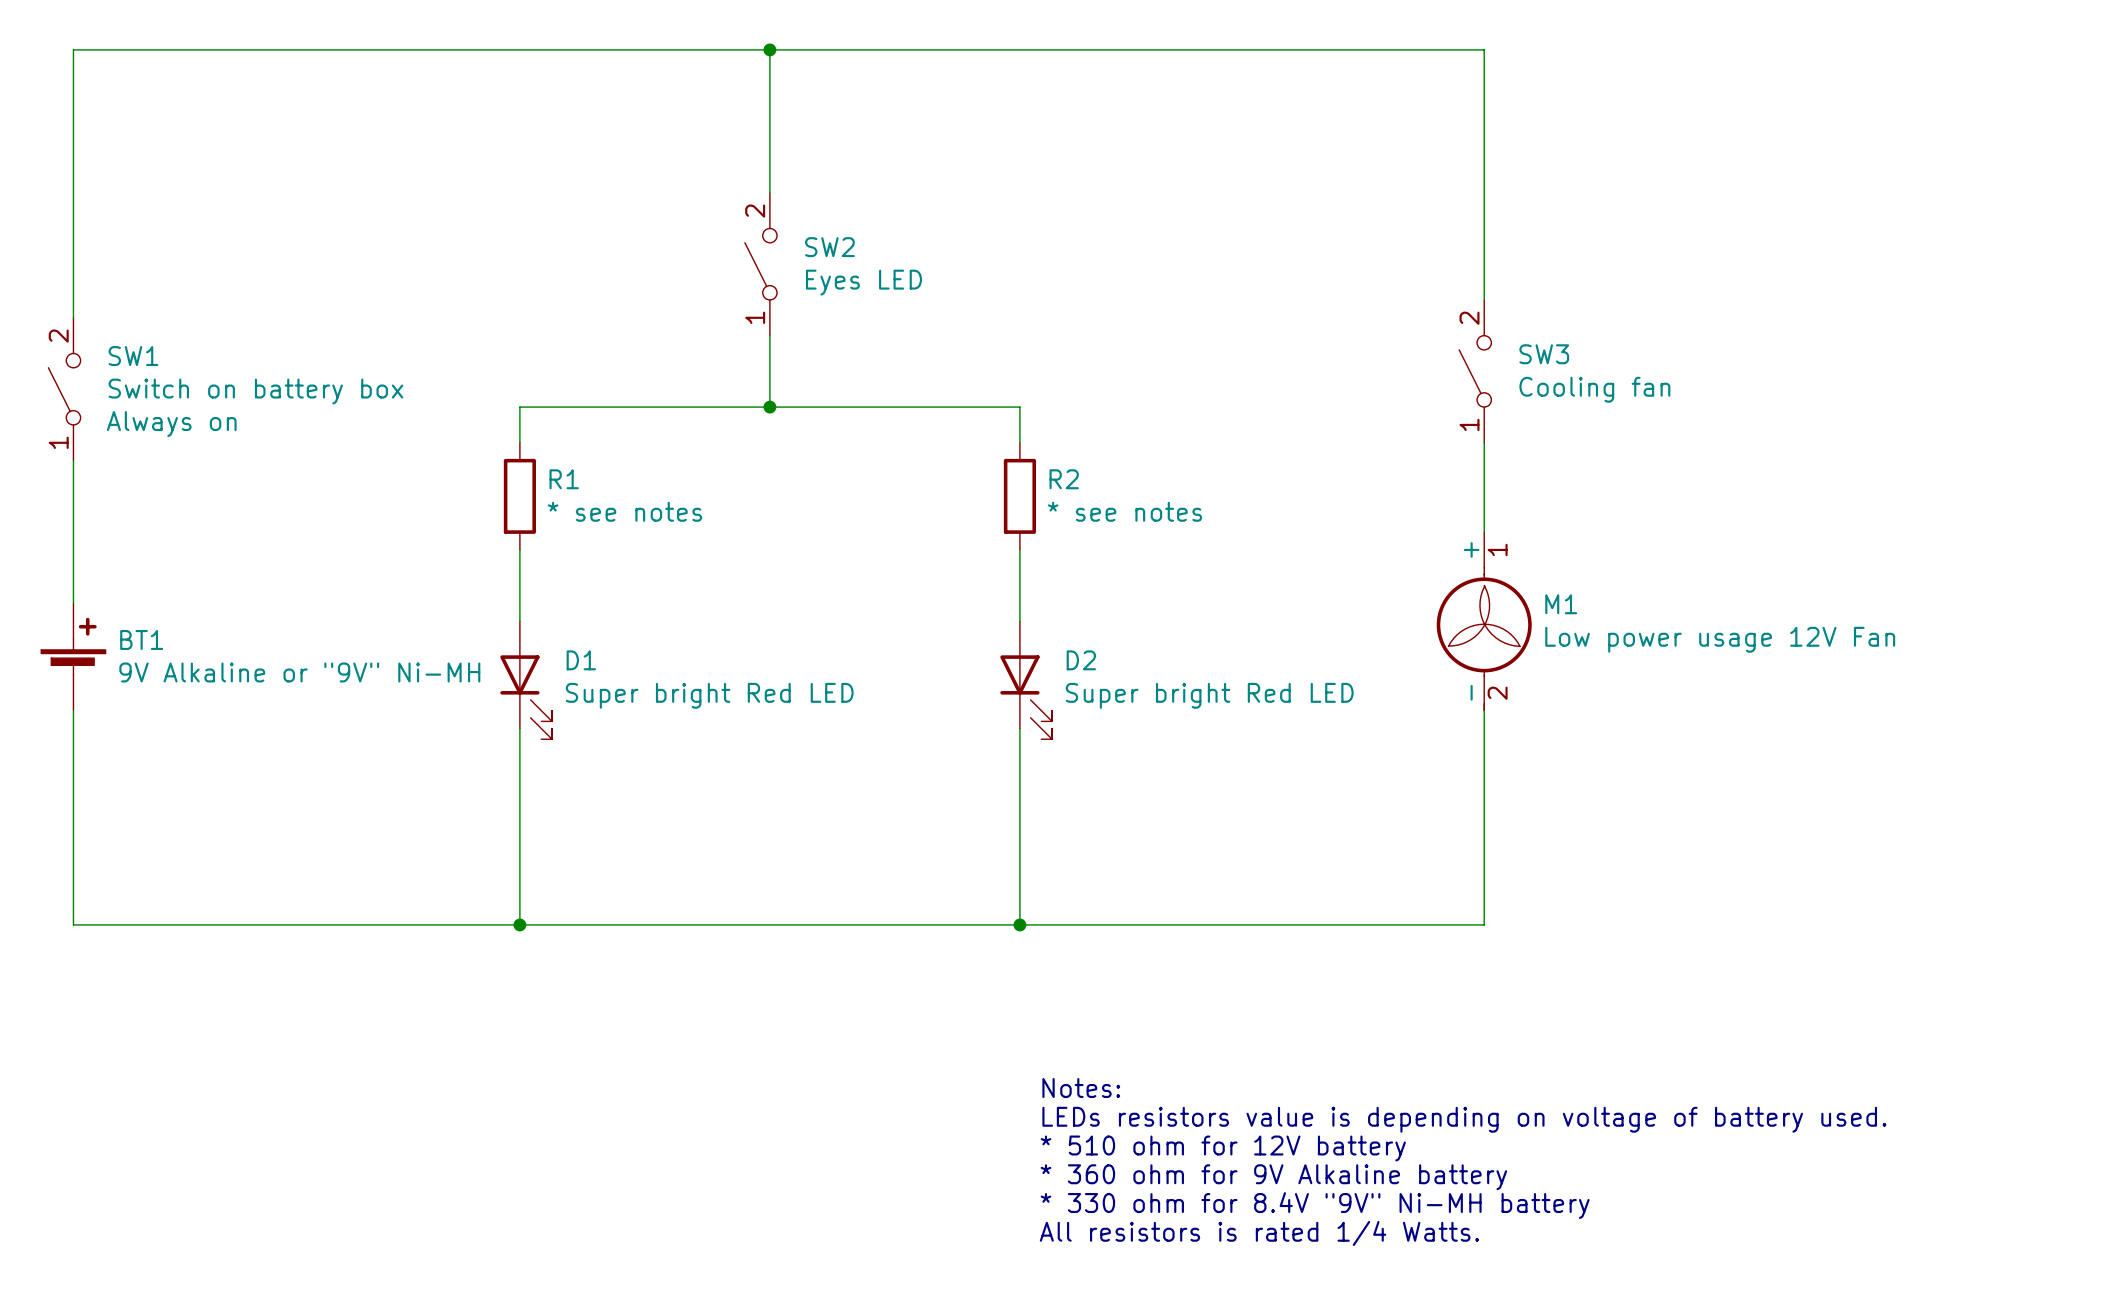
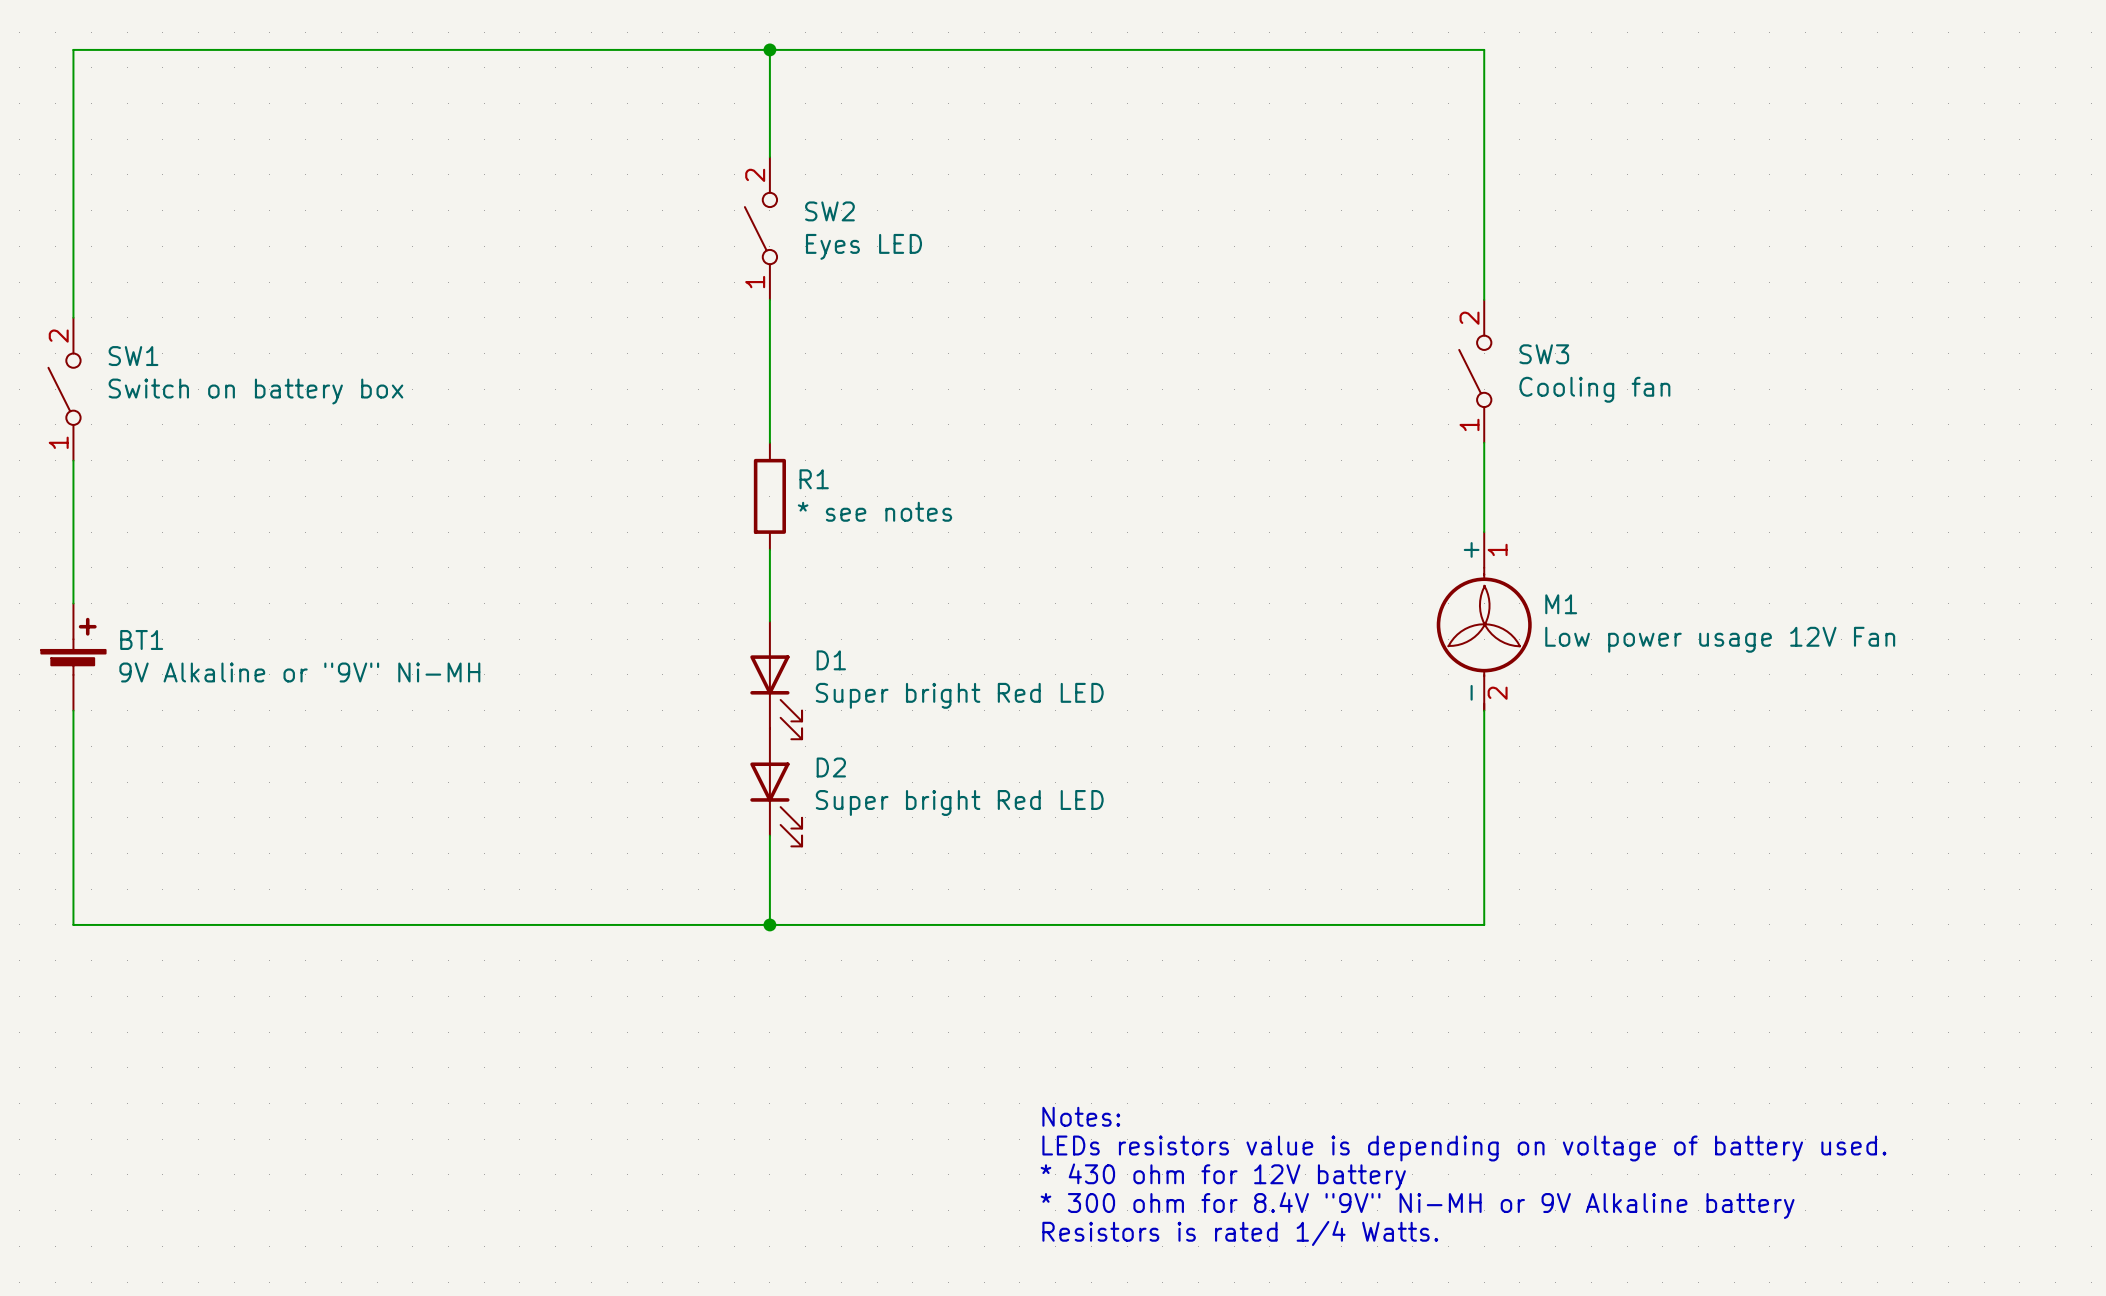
SW2 position: (760, 264) -> (760, 228)
wire: none -> (769, 407) (769, 442)
junction: (769, 407) -> none
SW1 text: Always on (171, 424) -> none
wire: (519, 442) (519, 407) (1019, 407) (1019, 442) -> none
R1 position: (519, 496) -> (769, 496)
R2: * see notes (1019, 496) -> none
wire: (519, 549) (519, 621) -> (769, 549) (769, 621)
wire: (1019, 549) (1019, 621) -> none
D1 position: (526, 680) -> (776, 680)
D2 position: (1026, 680) -> (776, 787)
wire: (519, 728) (519, 924) -> none
wire: (1019, 728) (1019, 924) -> none
wire: none -> (769, 835) (769, 924)
junction: (519, 924) -> none
junction: none -> (769, 924)
junction: (1019, 924) -> none
text: Notes: (1081, 1088) -> none
text: LEDs resistors value is depending on voltage of battery used. (1464, 1119) -> Notes: (1081, 1116)
text: * 510 ohm for 12V battery (1223, 1148) -> LEDs resistors value is depending on voltage of battery used. (1464, 1148)
text: * 360 ohm for 9V Alkaline battery (1273, 1177) -> * 430 ohm for 12V battery (1223, 1176)
text: * 330 ohm for 8.4V "9V" Ni-MH battery (1315, 1205) -> * 300 ohm for 8.4V "9V" Ni-MH or 9V Alkaline battery (1417, 1205)
text: All resistors is rated 1/4 Watts. (1259, 1233) -> Resistors is rated 1/4 Watts. (1240, 1233)

